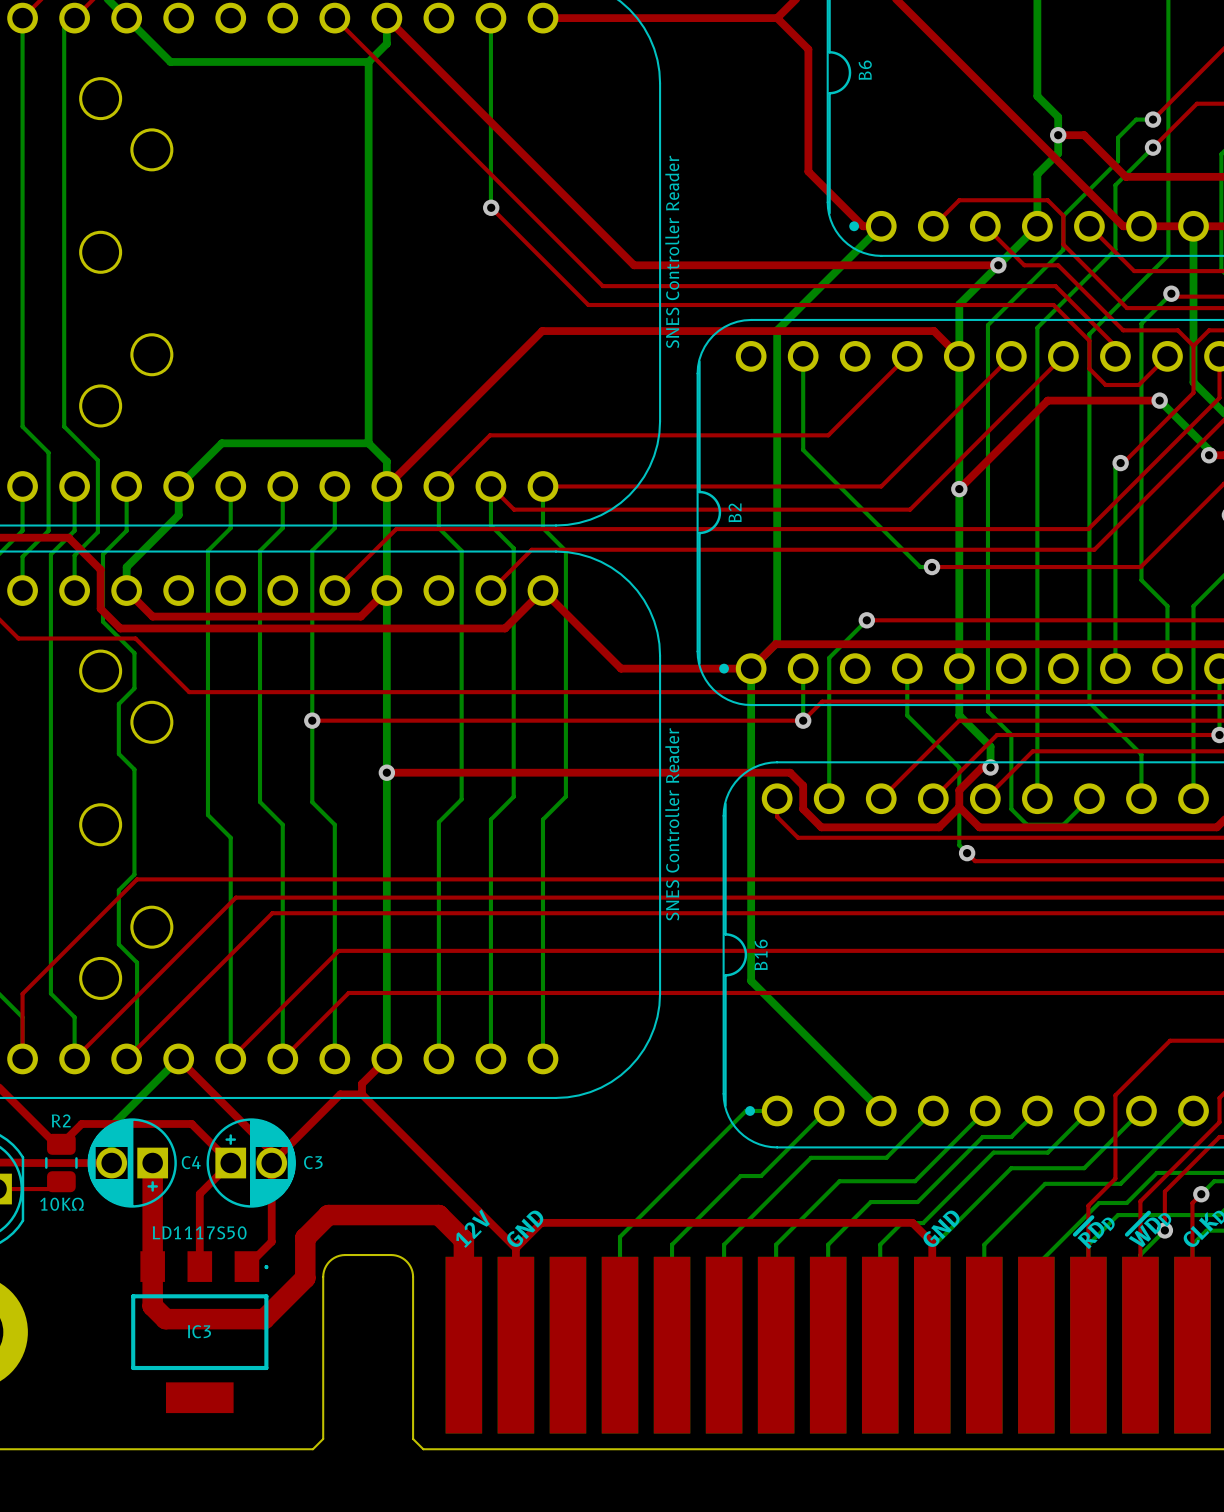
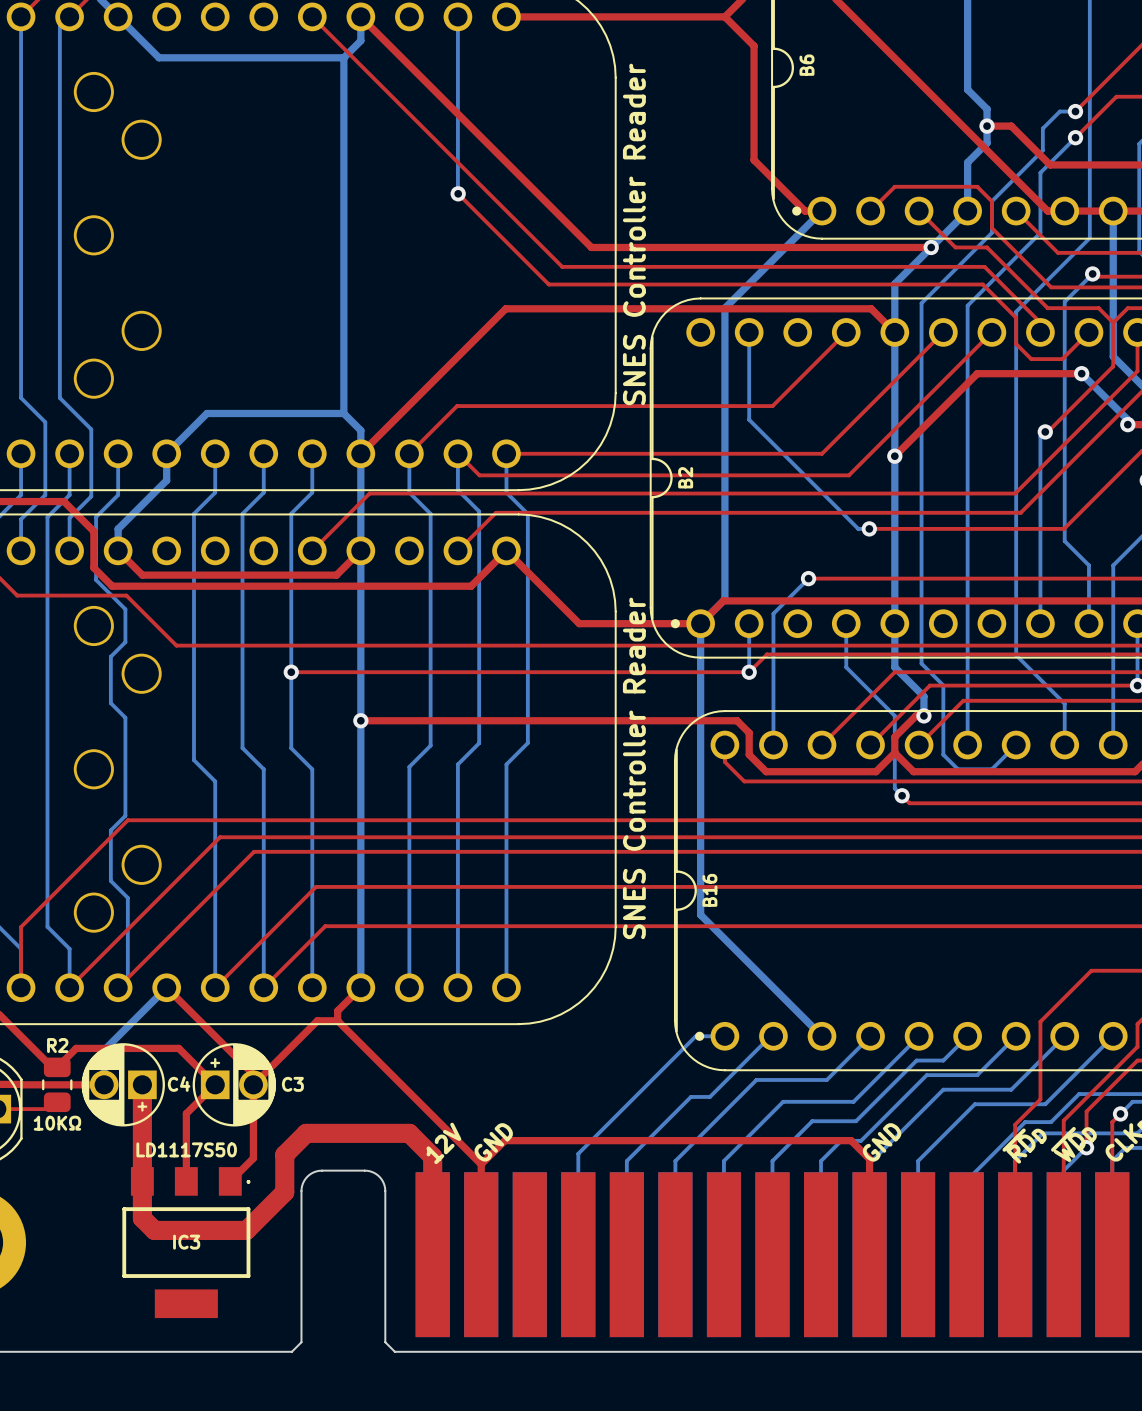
part text: SNES Controller Reader (672, 251) -> none
part text: none -> SNES Controller Reader (634, 234)
part text: SNES Controller Reader (672, 824) -> none
part text: none -> SNES Controller Reader (634, 768)

